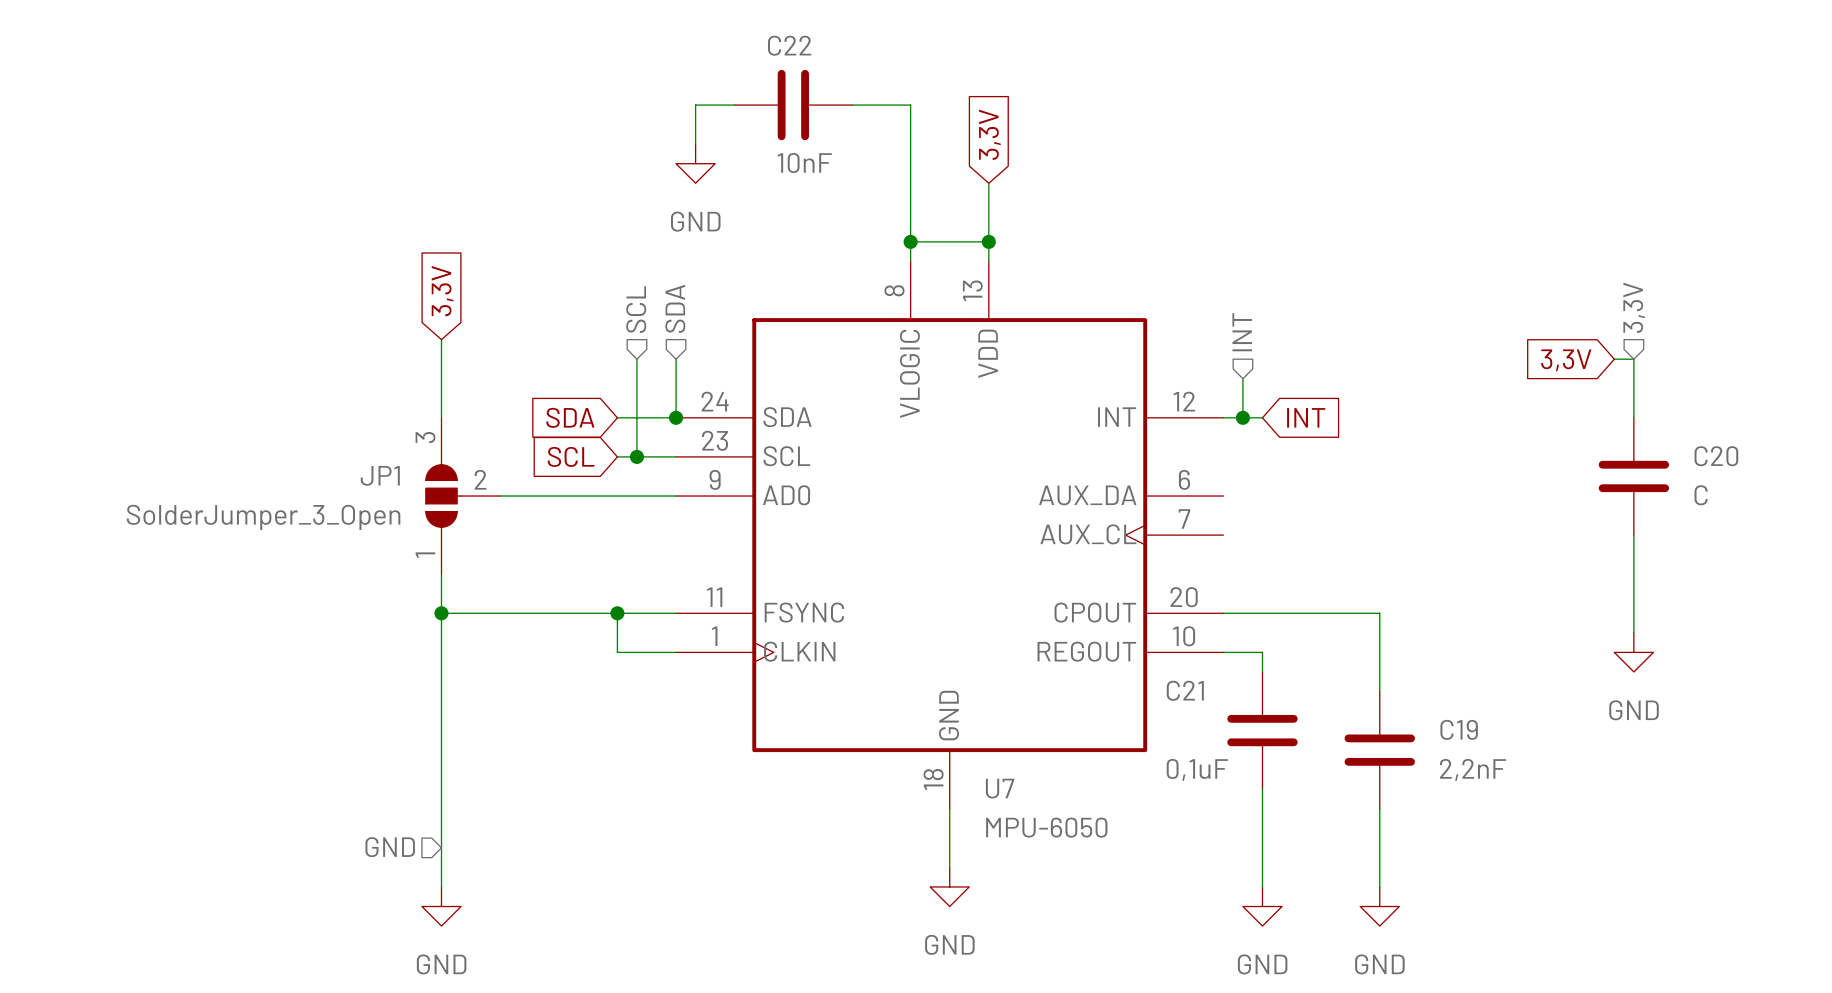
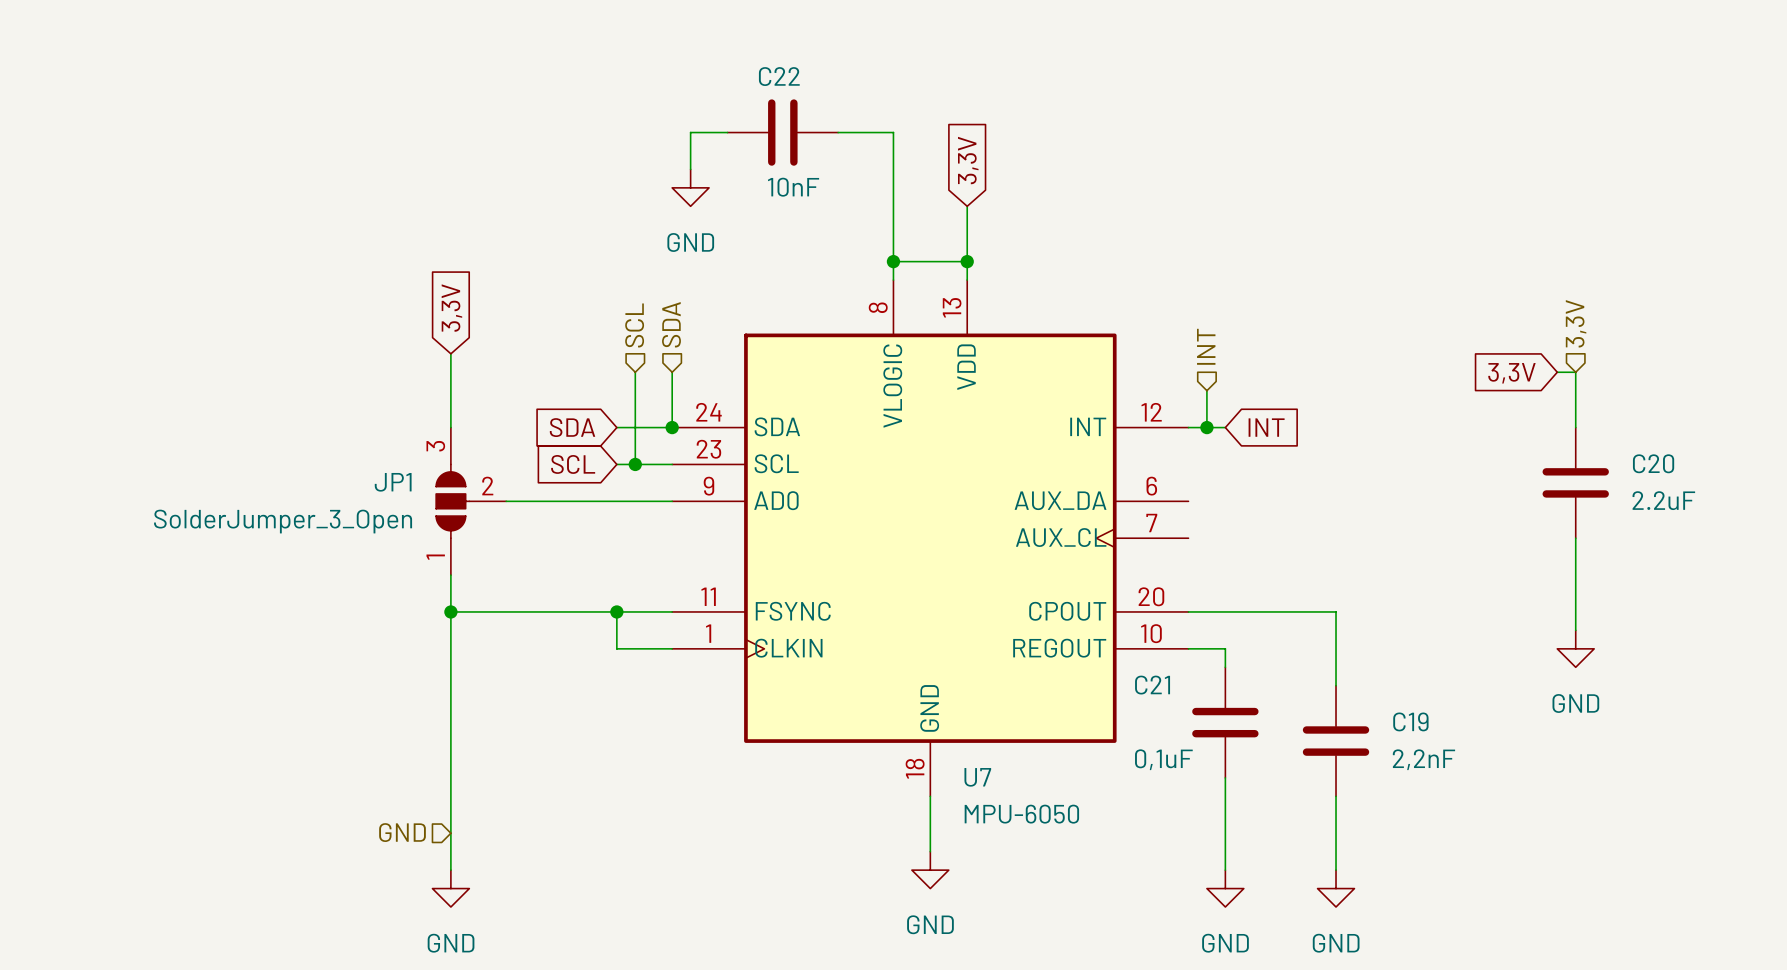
C20 value: C (1701, 495) -> 2.2uF (1663, 500)

